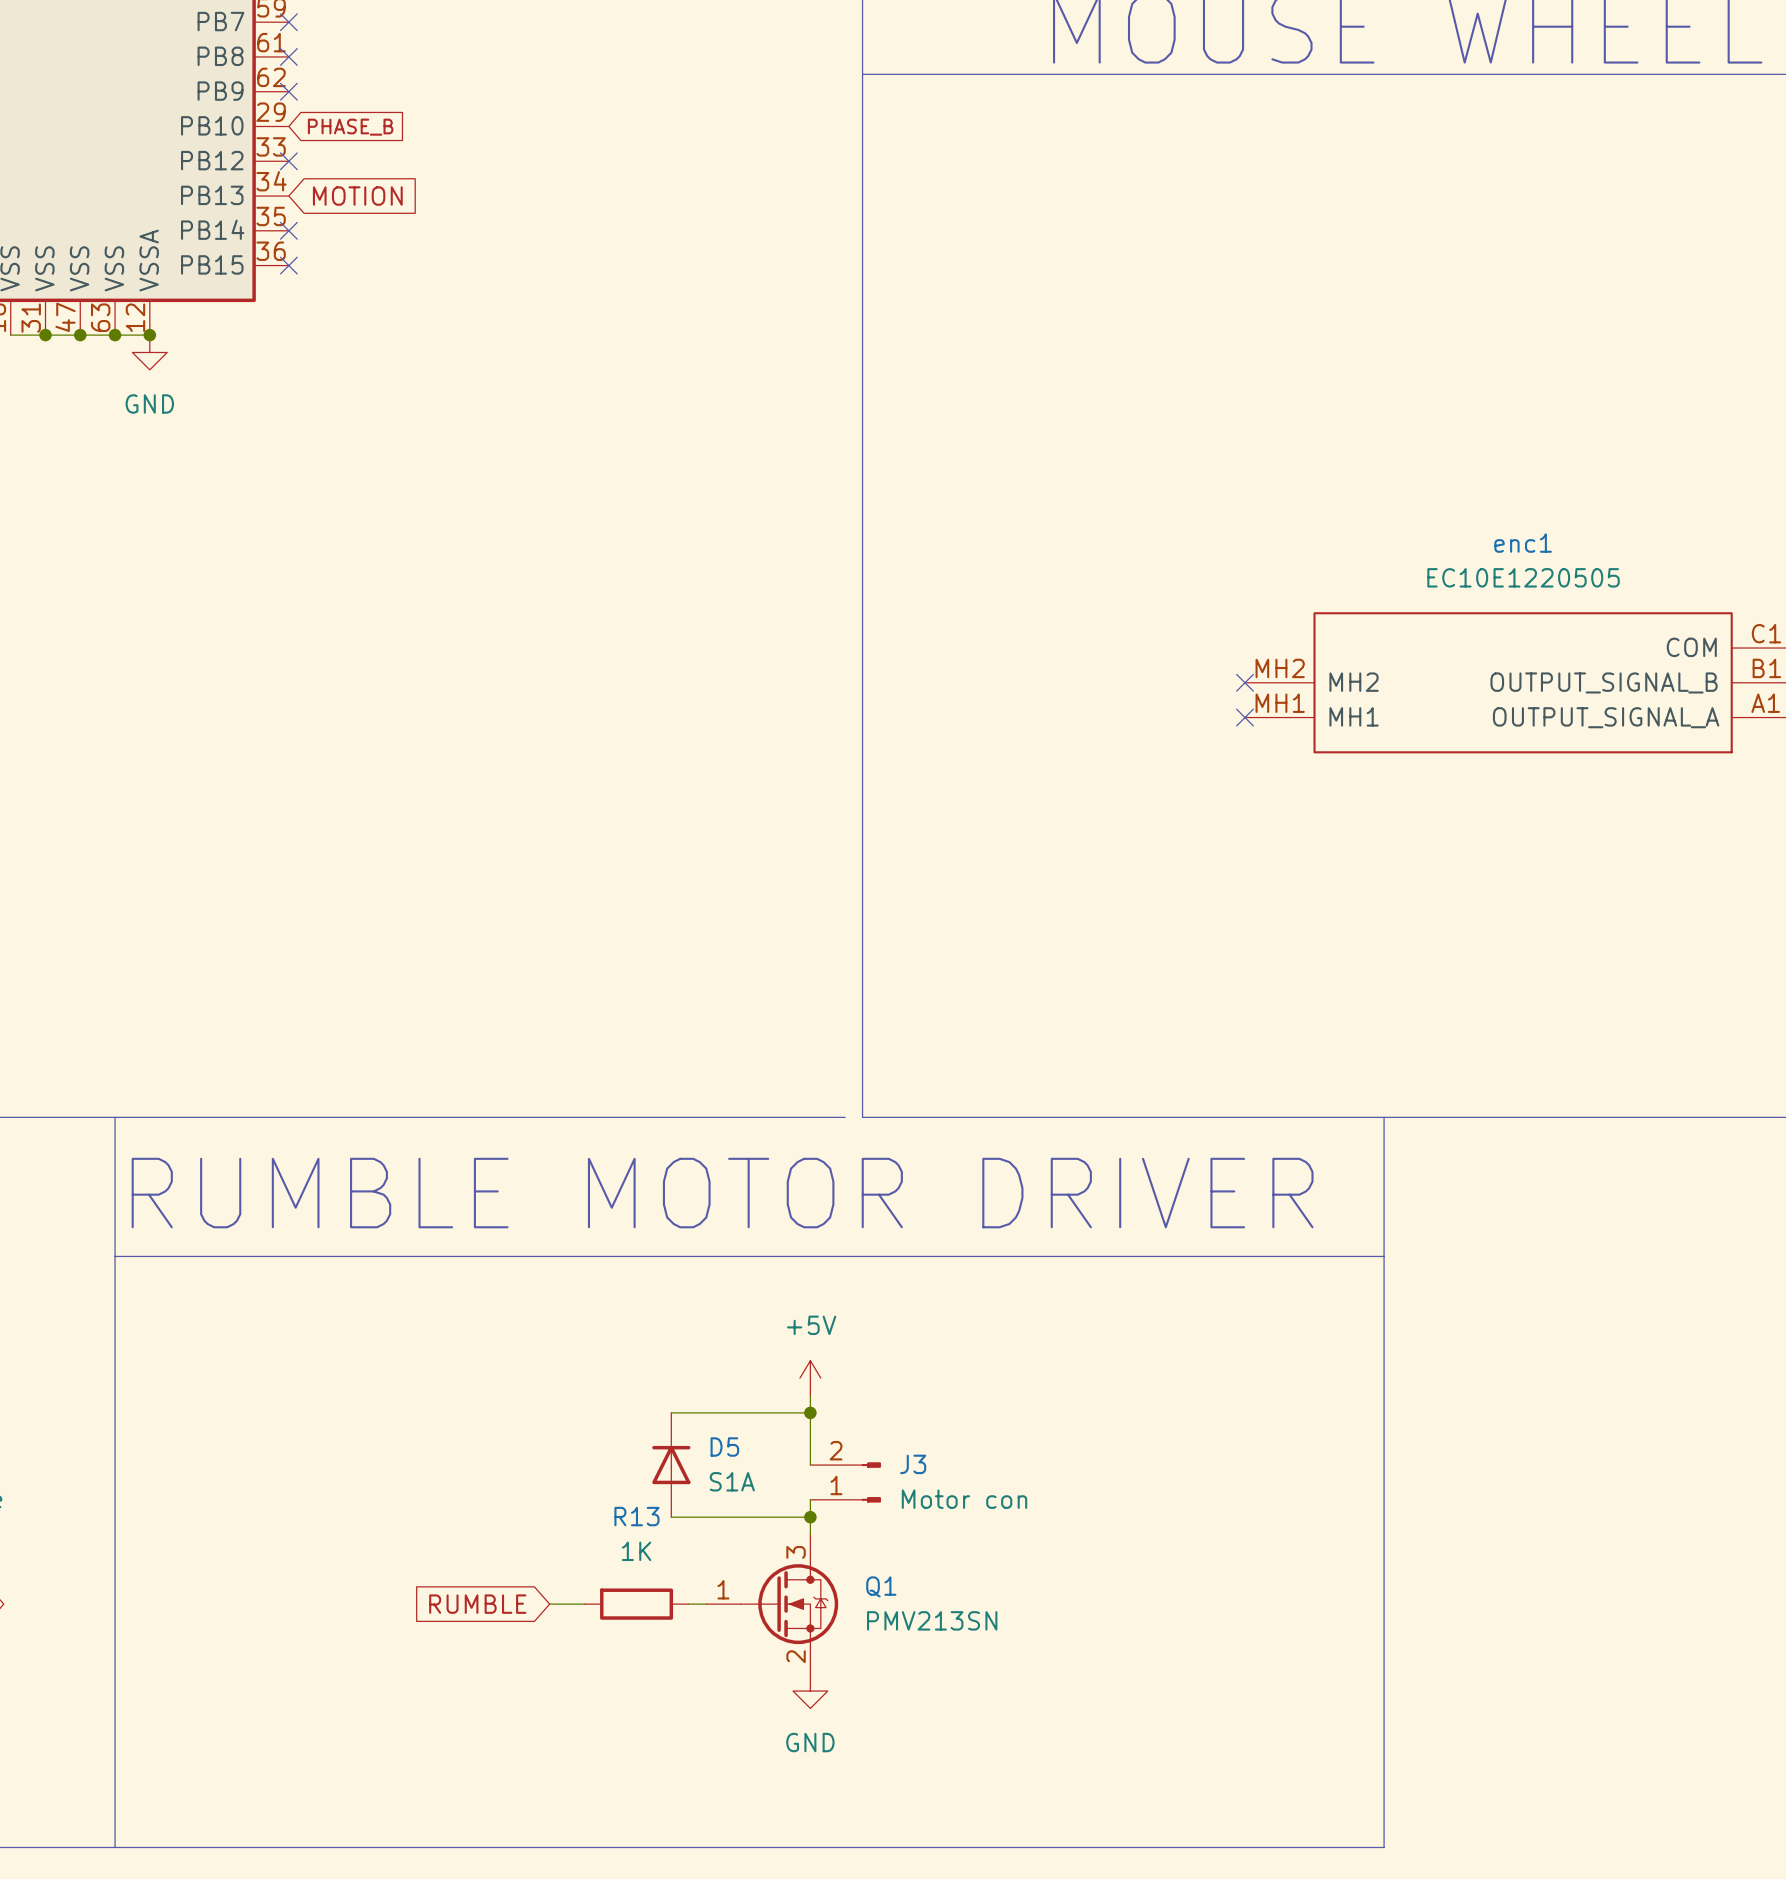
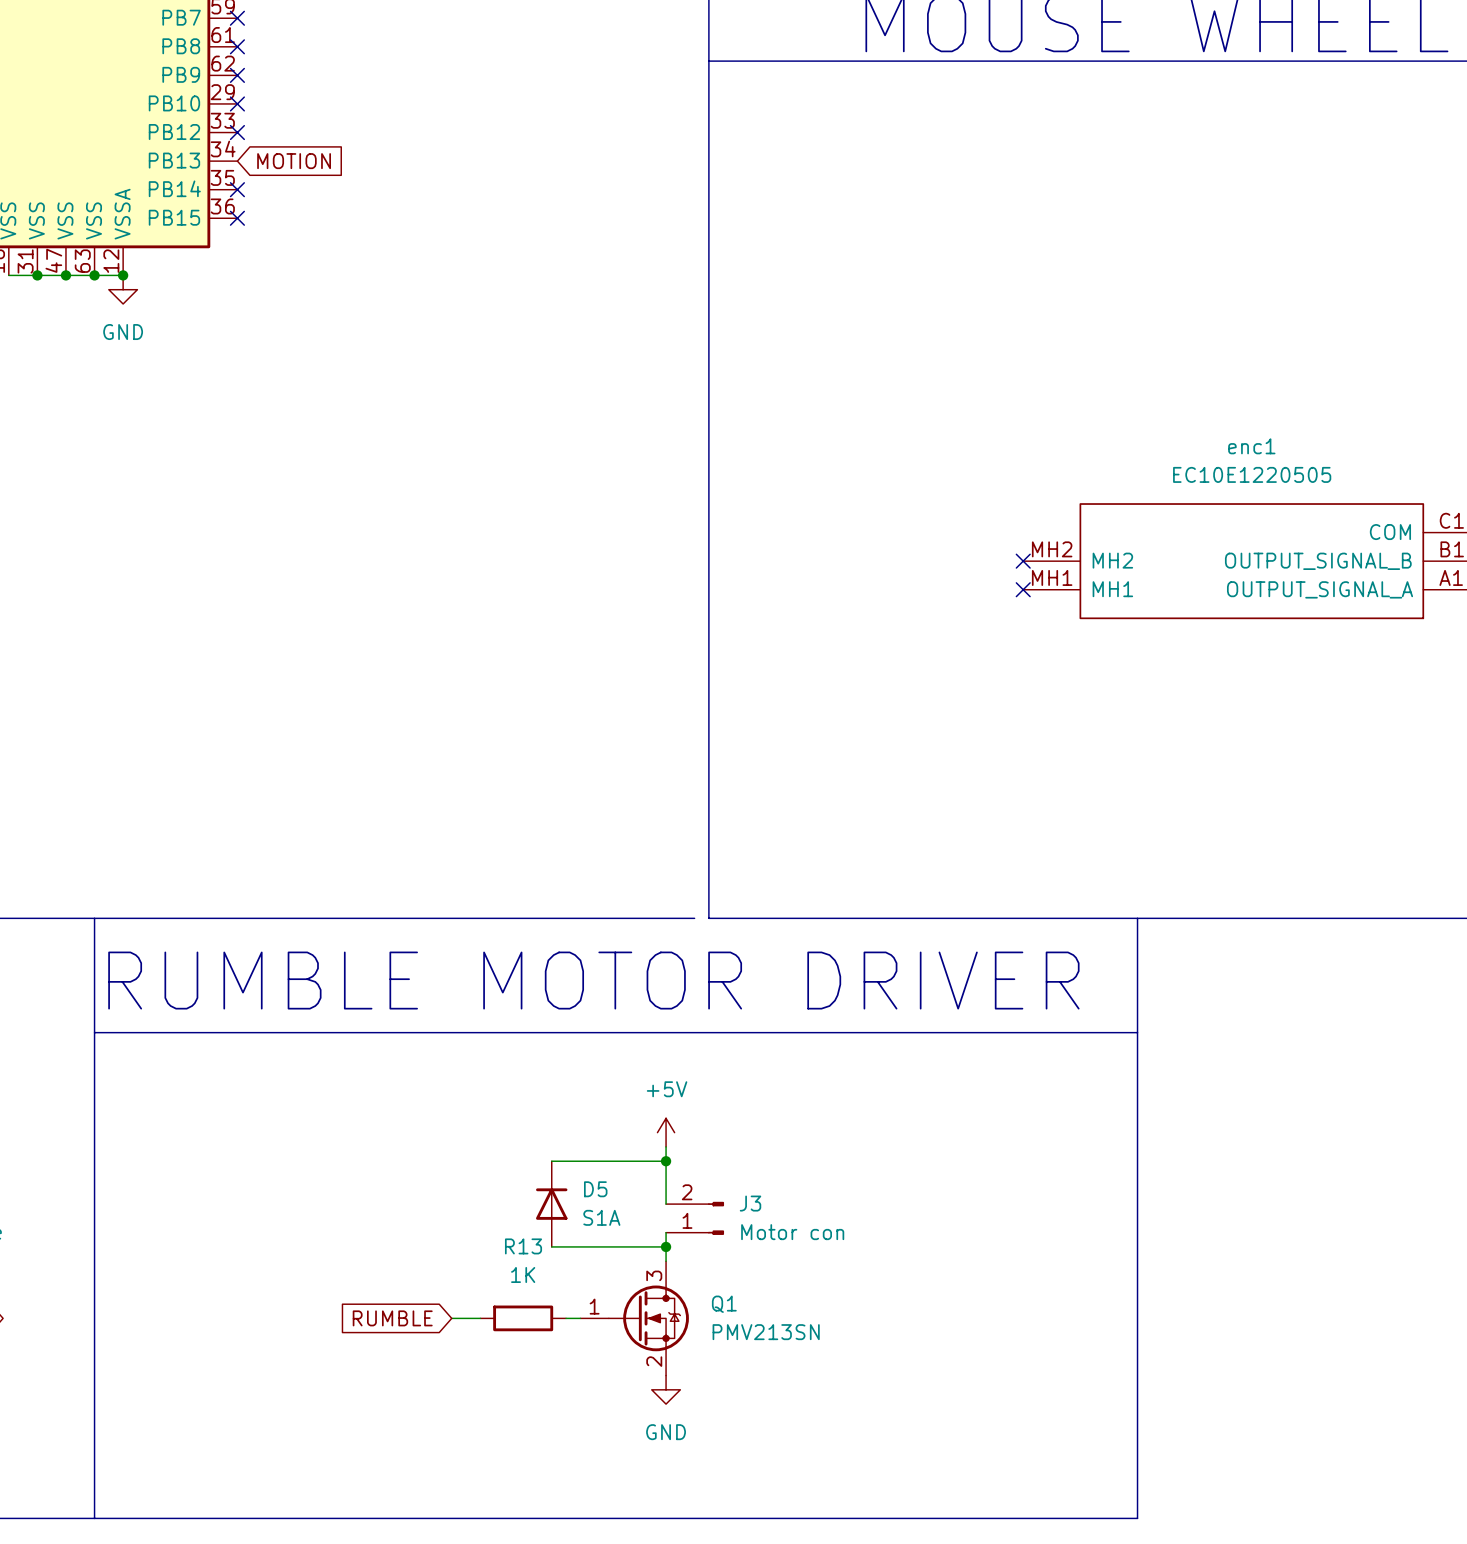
no-connect mark: none -> (237, 103)
global label: PHASE_B (350, 127) -> none

